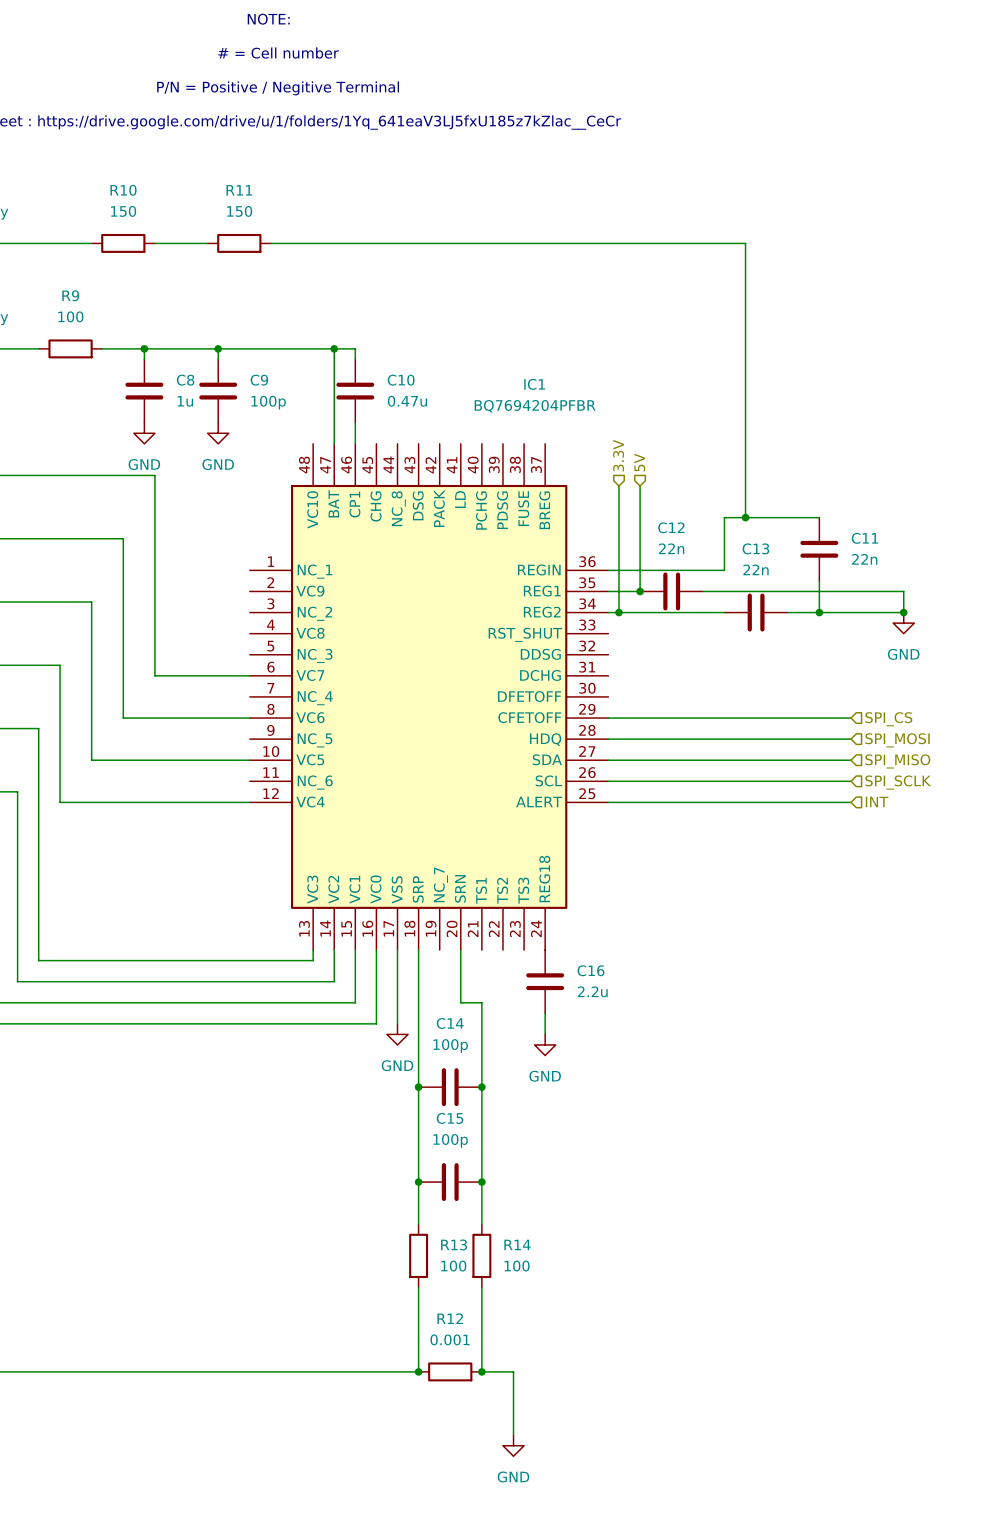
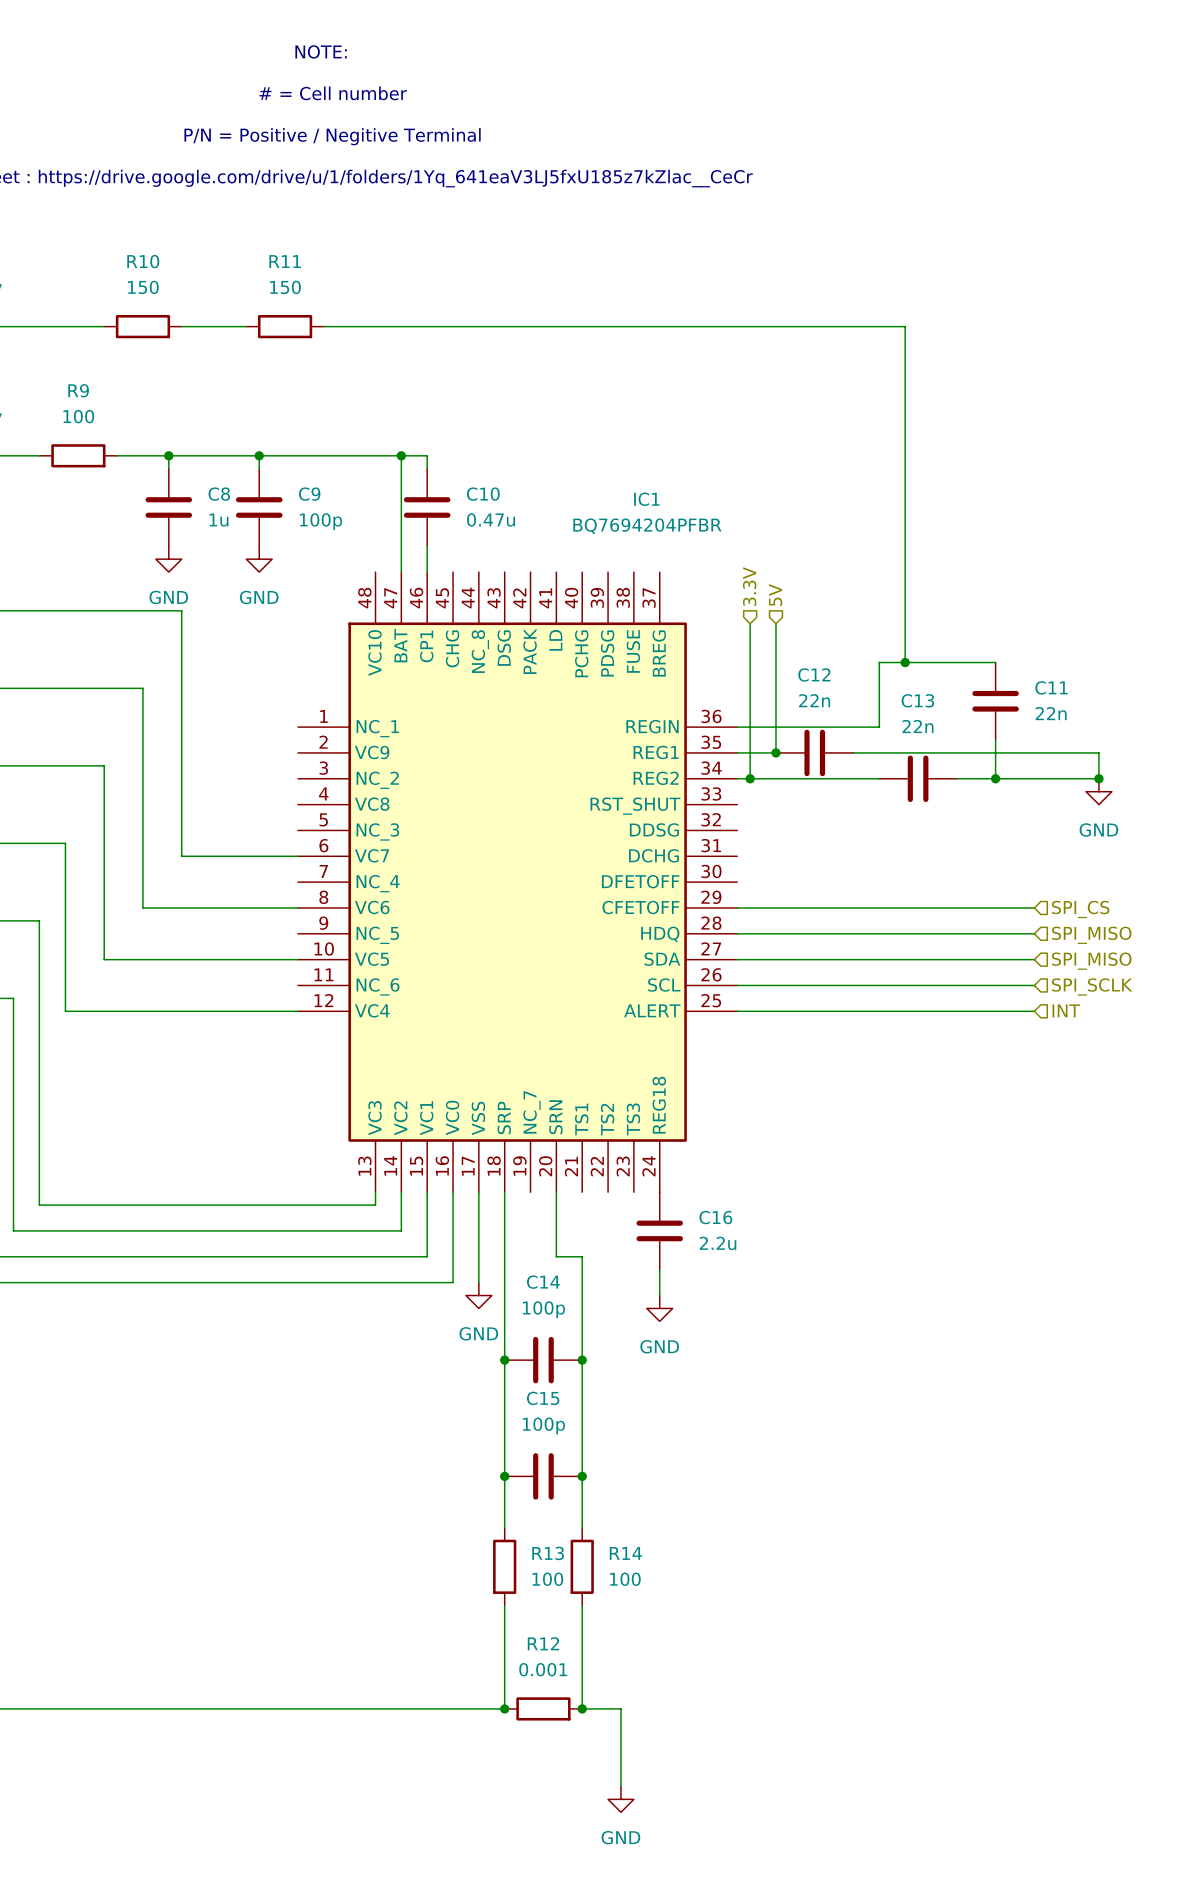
hierarchical label: SPI_MOSI (897, 740) -> SPI_MISO (1091, 935)

